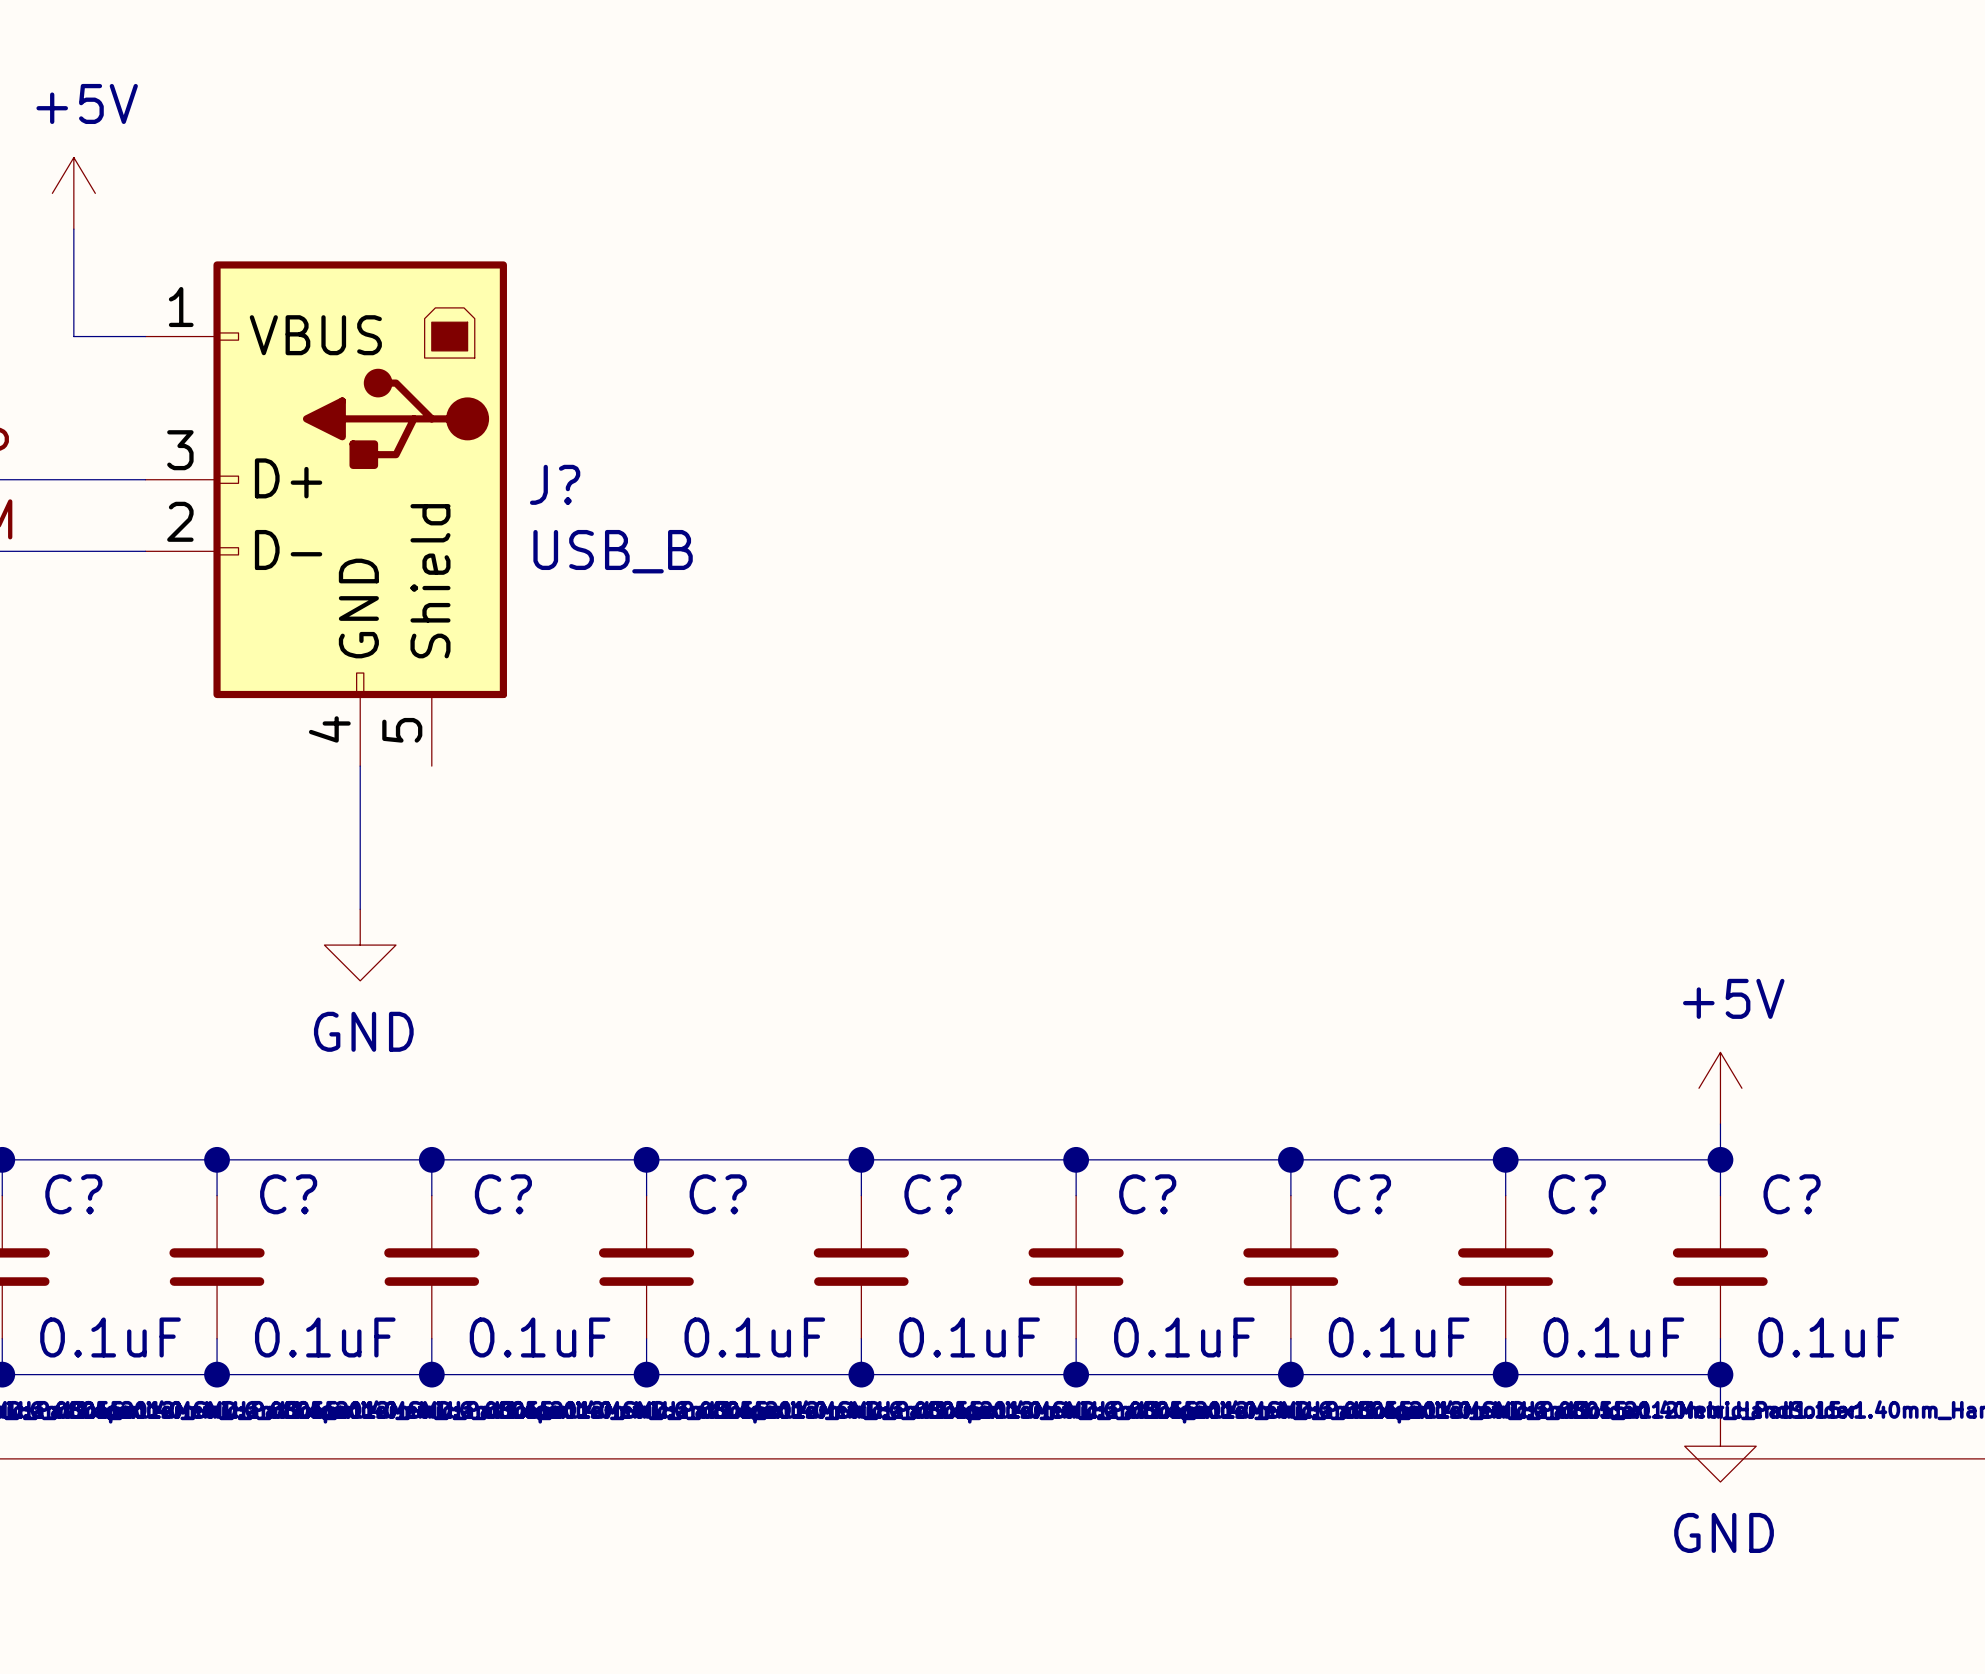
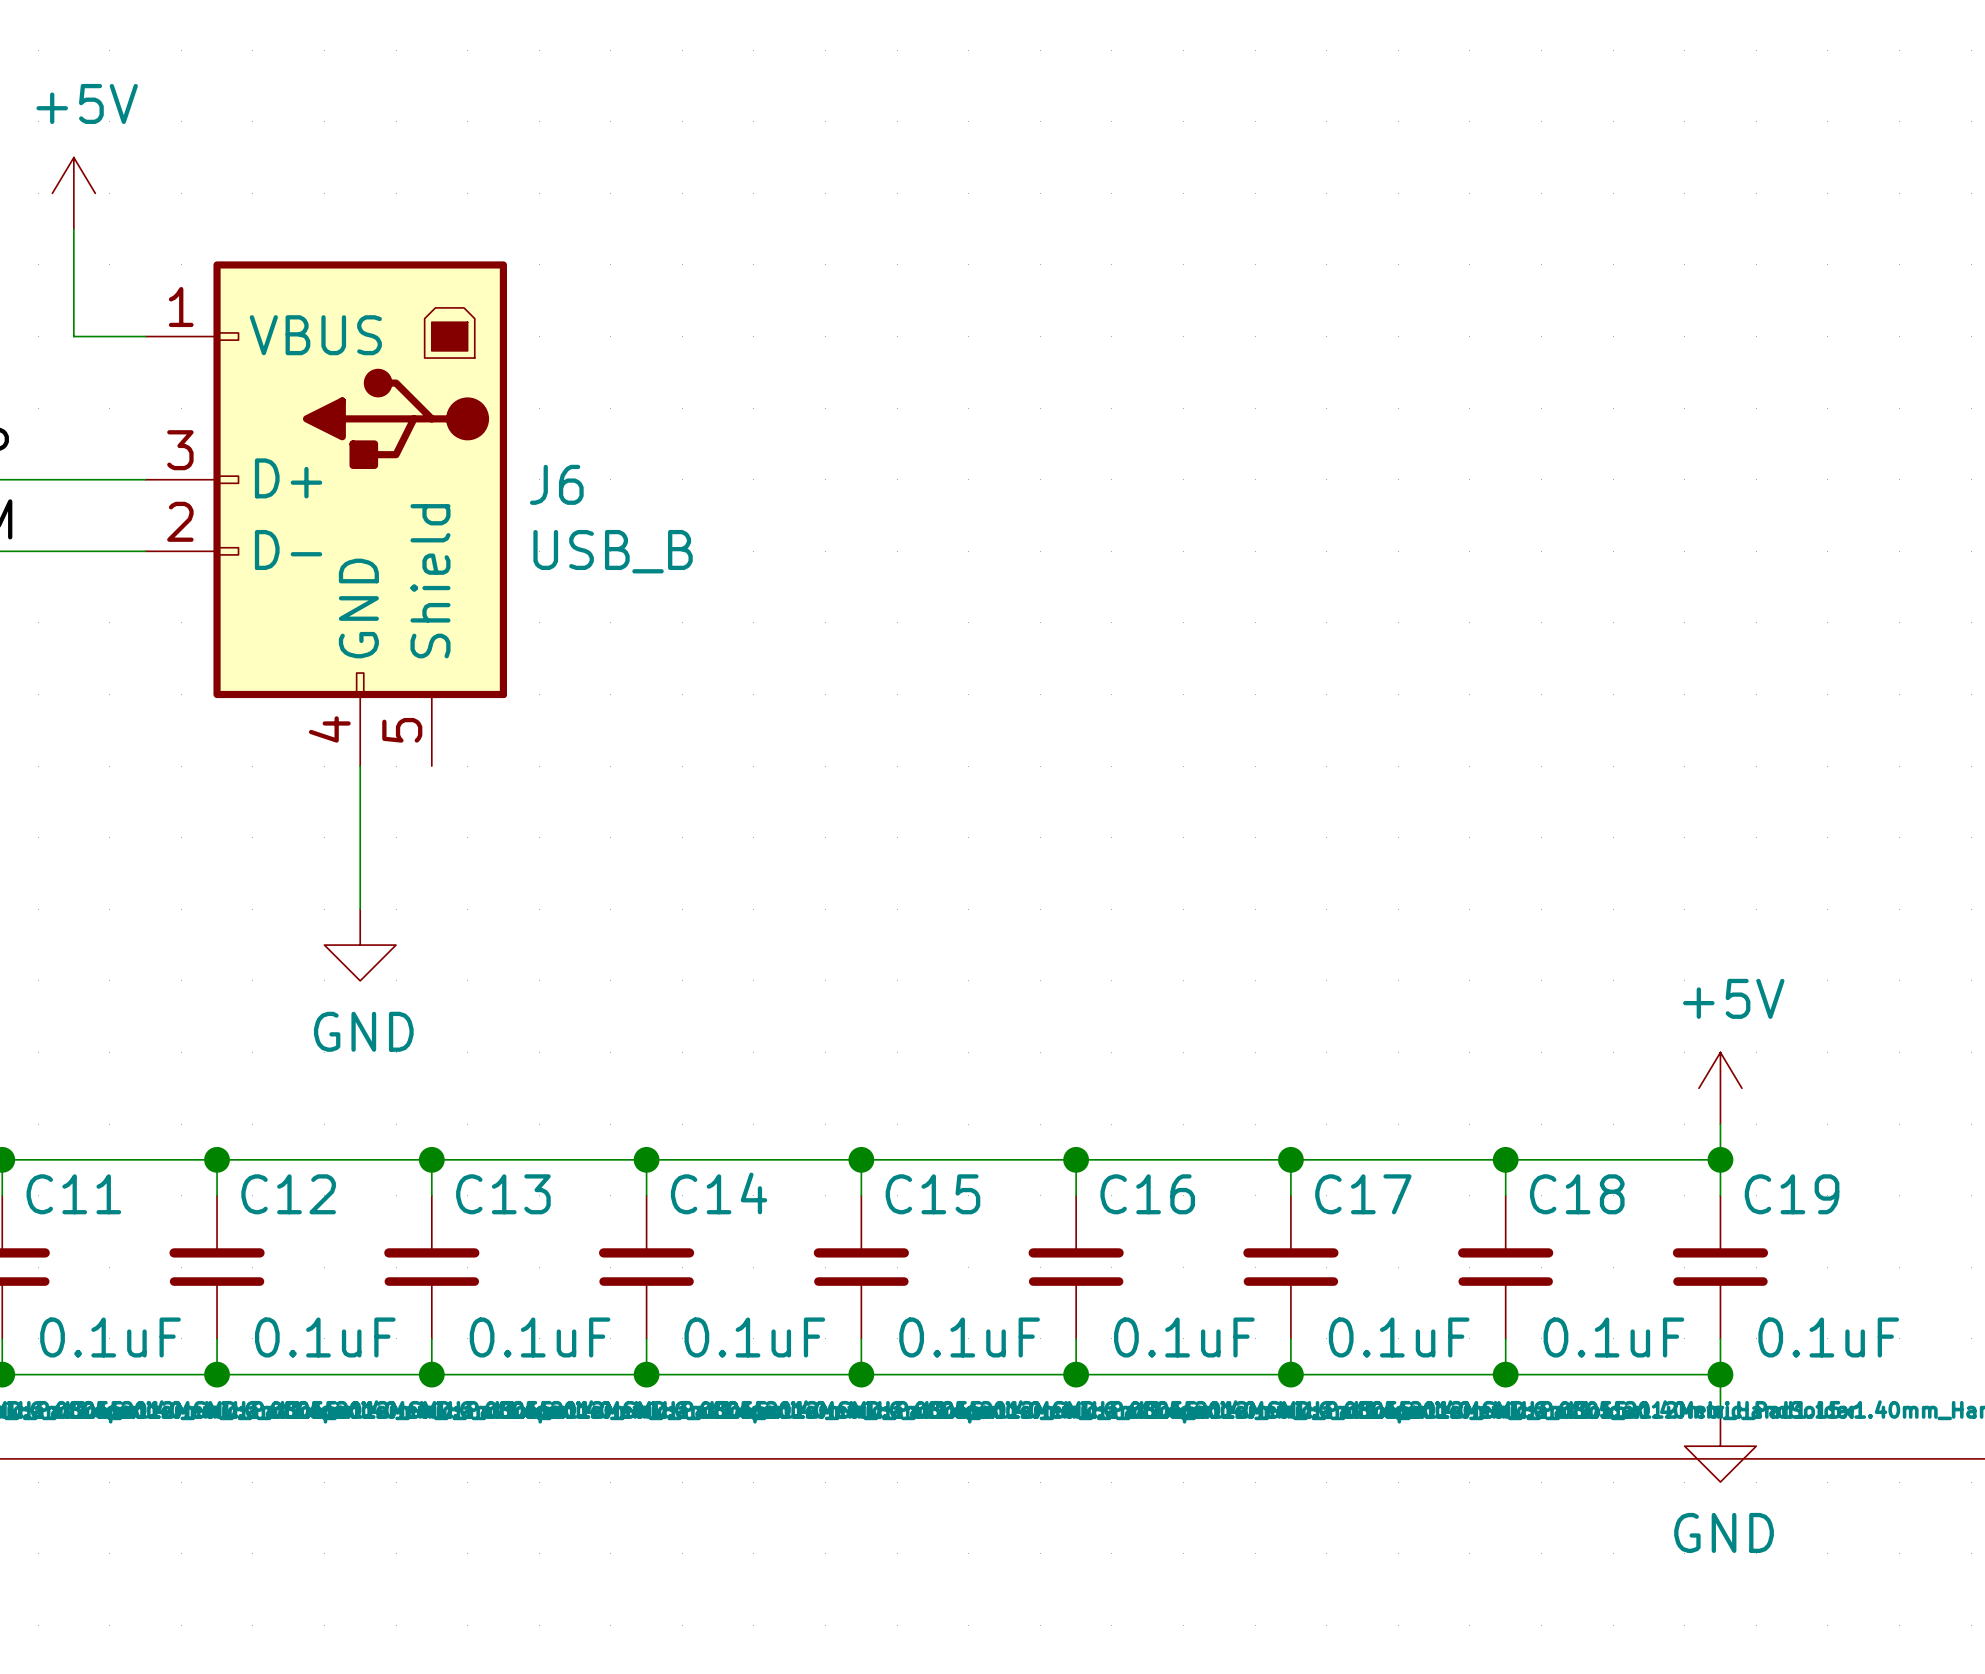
J? name: J? (555, 484) -> J6 (556, 484)
C? name: C? (73, 1194) -> C11 (73, 1194)
C? name: C? (288, 1194) -> C12 (288, 1194)
C? name: C? (503, 1194) -> C13 (503, 1194)
C? name: C? (718, 1194) -> C14 (719, 1193)
C? name: C? (932, 1194) -> C15 (932, 1194)
C? name: C? (1147, 1194) -> C16 (1147, 1194)
C? name: C? (1362, 1194) -> C17 (1363, 1194)
C? name: C? (1577, 1194) -> C18 (1577, 1194)
C? name: C? (1792, 1194) -> C19 (1792, 1194)

